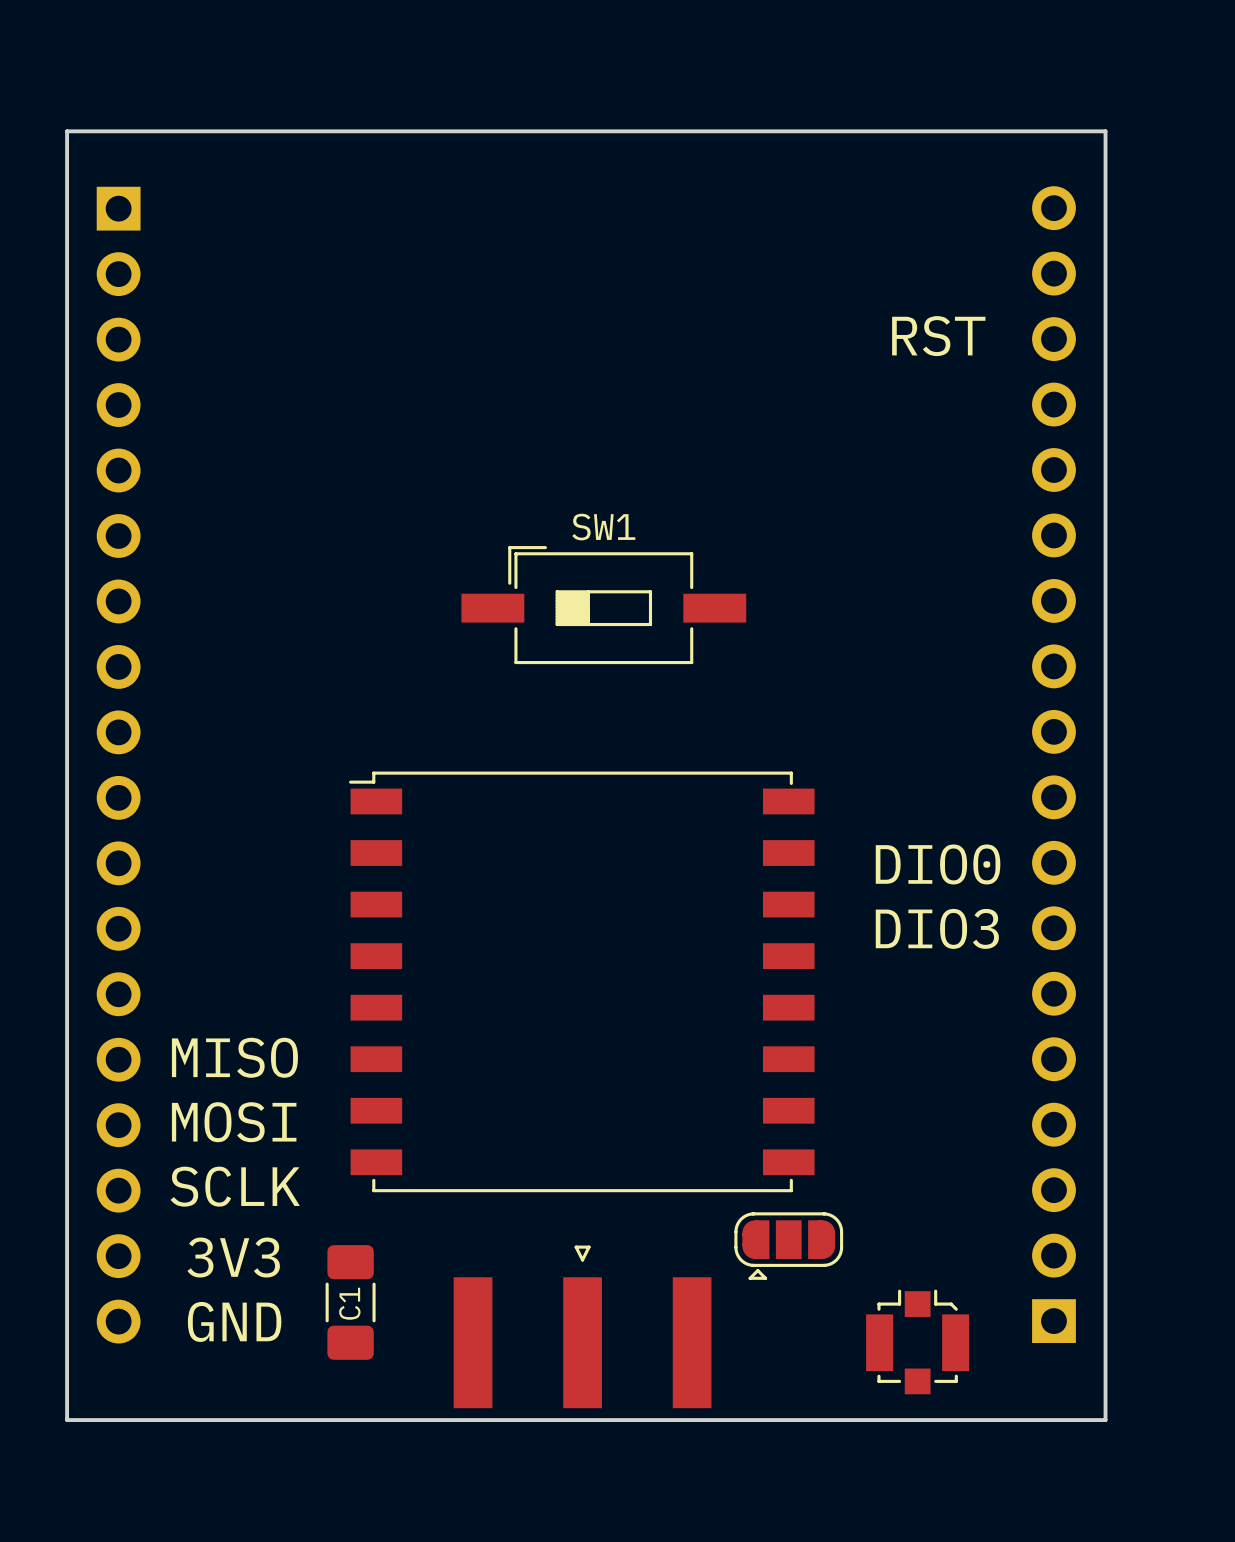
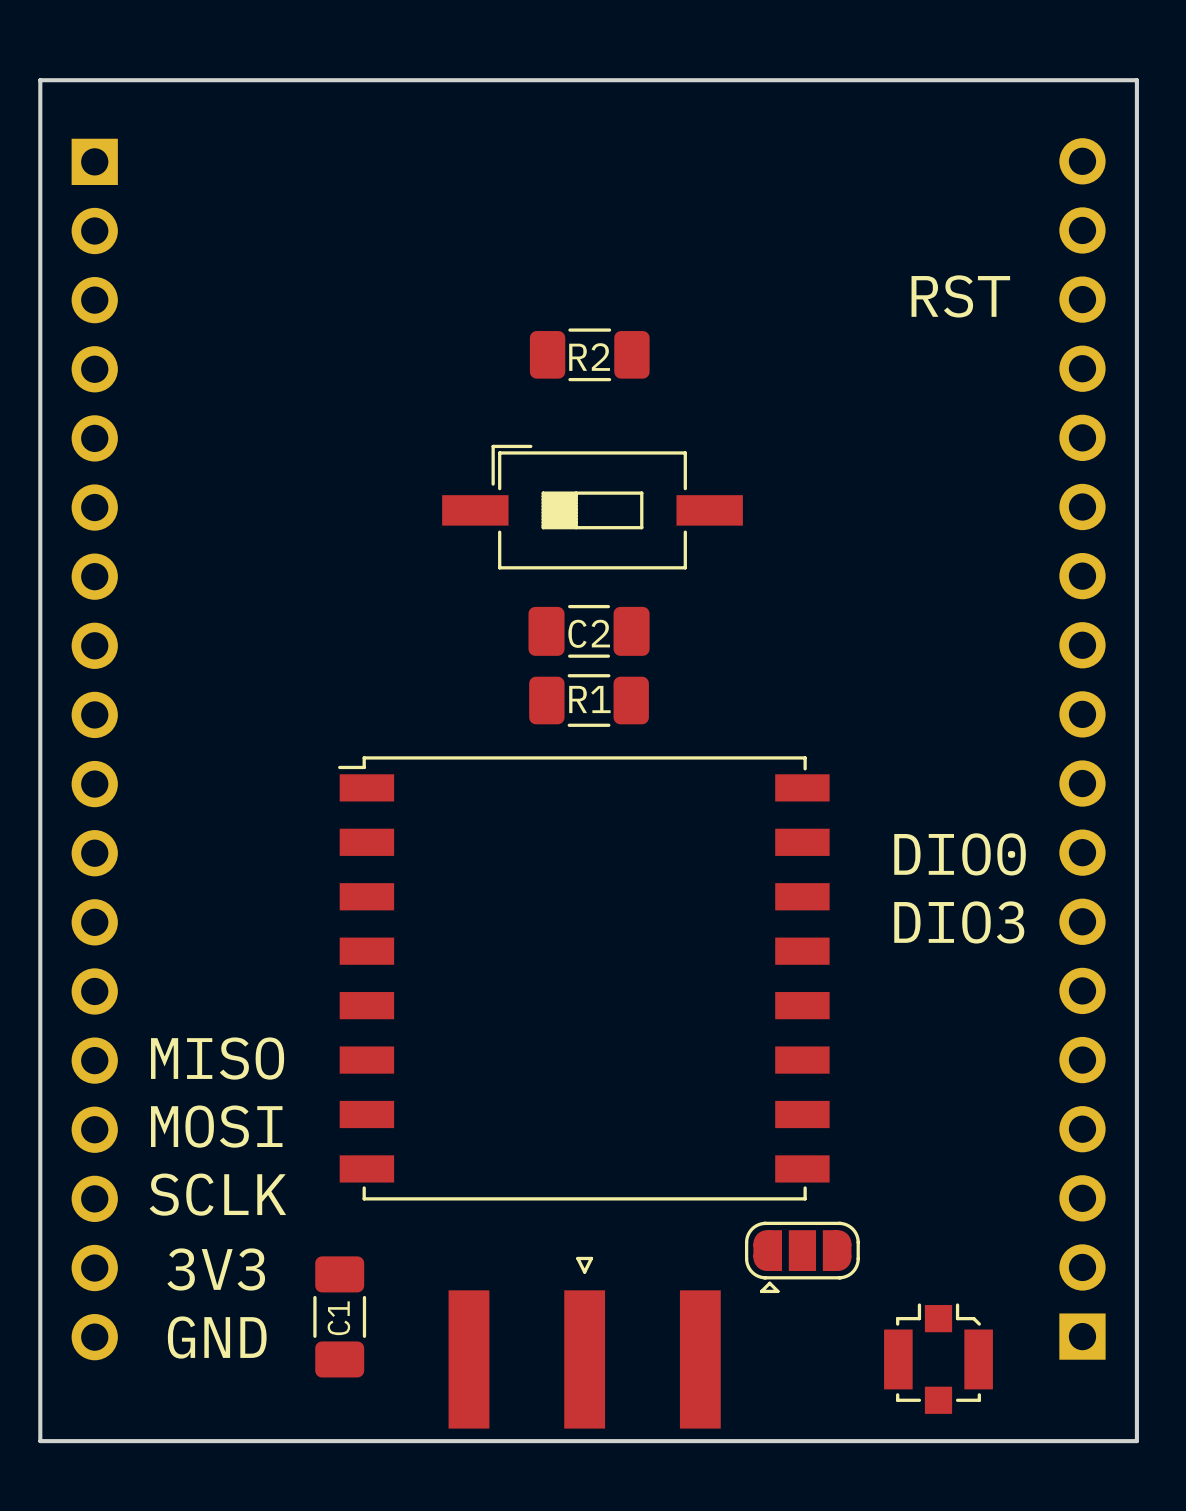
R2: none -> (589, 354)
part: none -> (592, 507)
SW1: (603, 605) -> none
C2: none -> (589, 631)
R1: none -> (589, 700)

